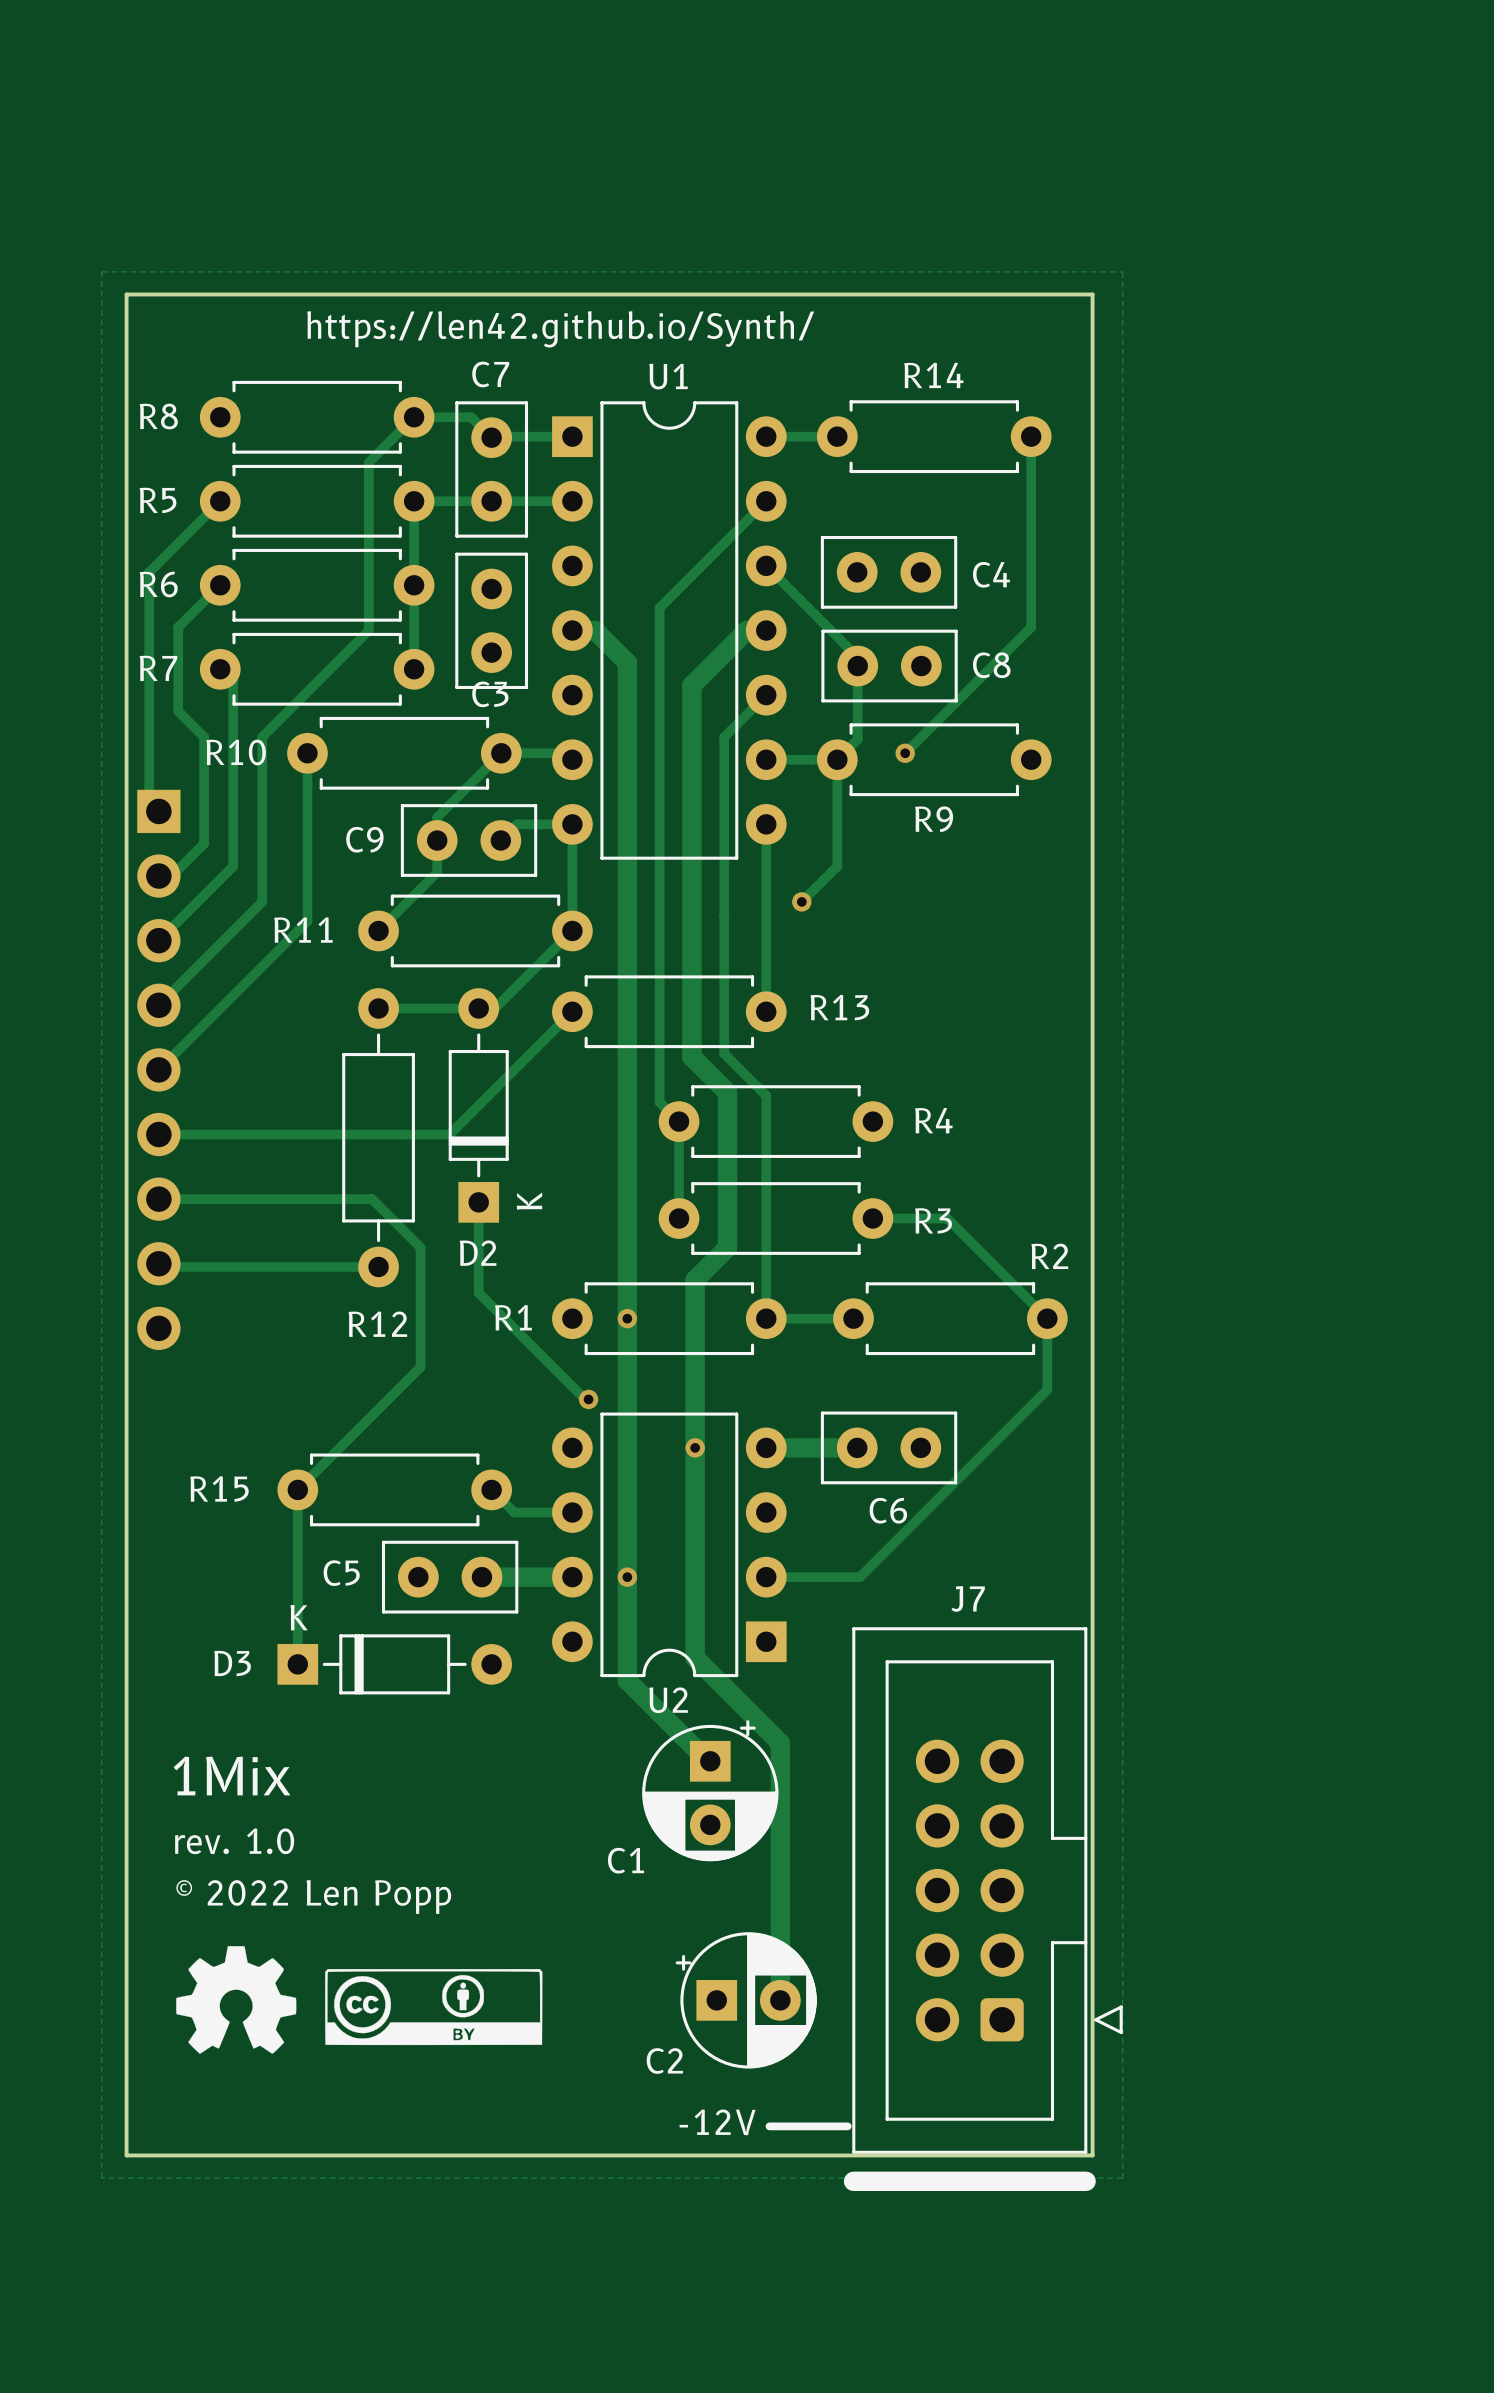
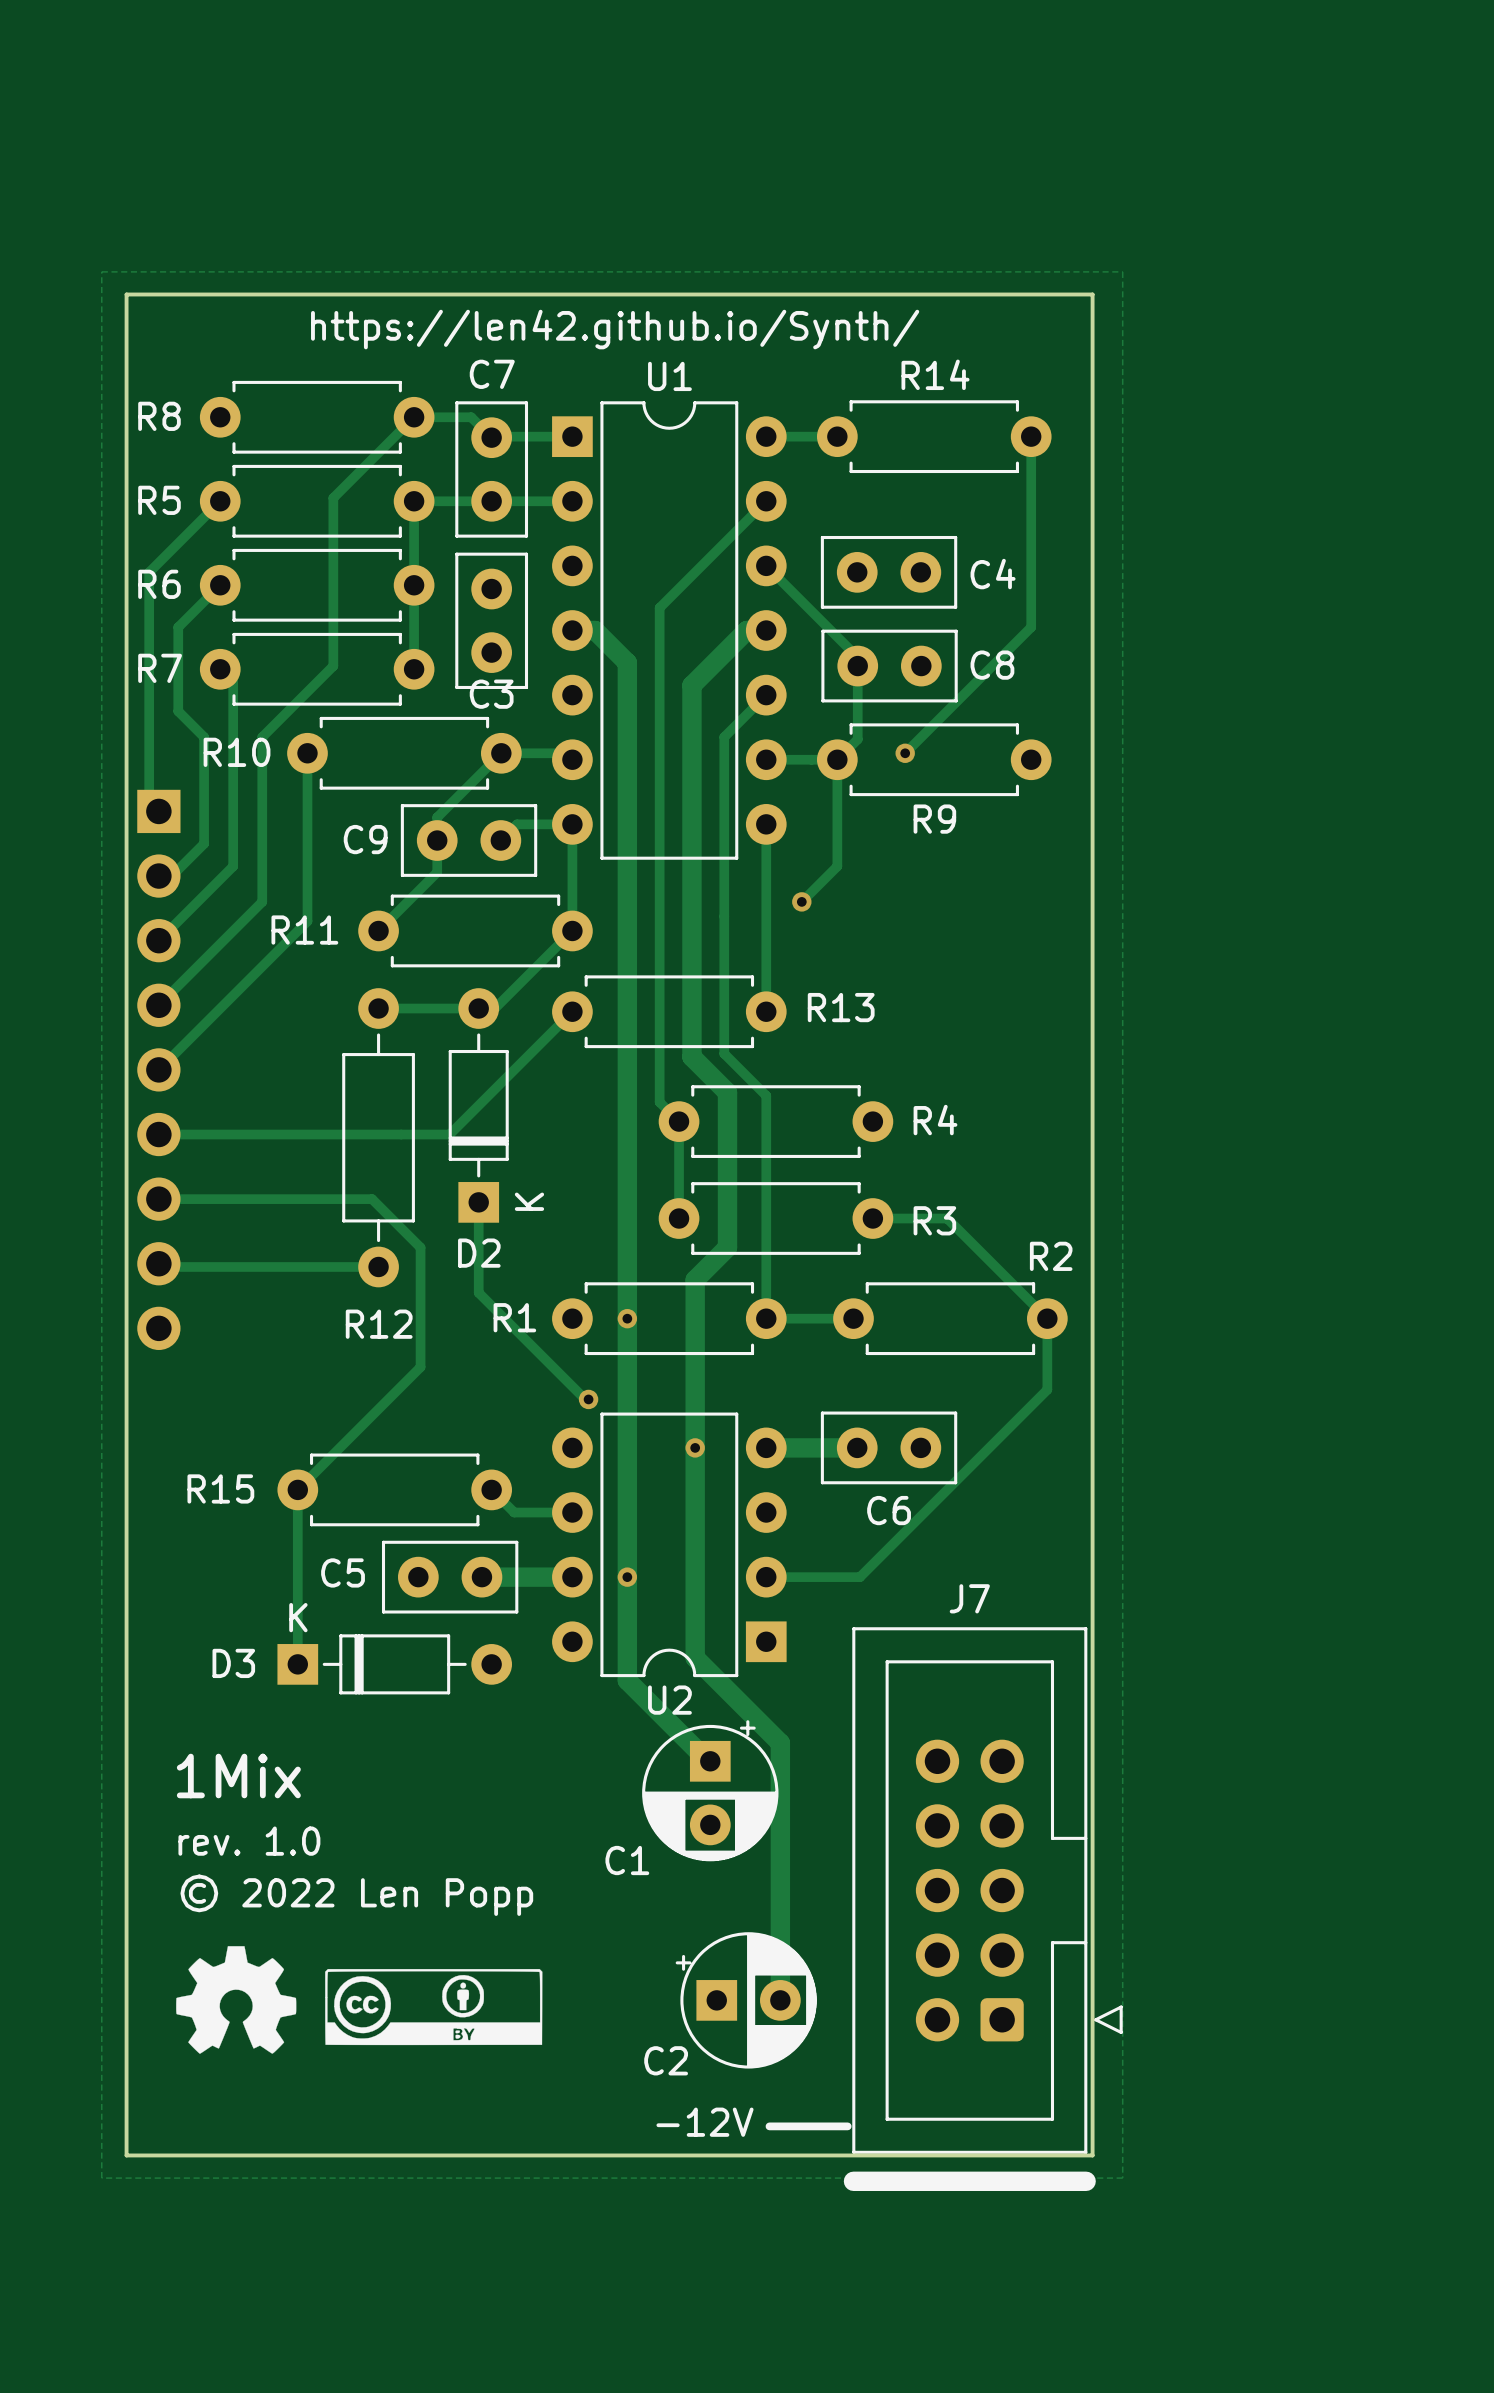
track: (368, 462) (368, 630) (333, 666) -> (368, 462) (333, 498) (333, 666)

